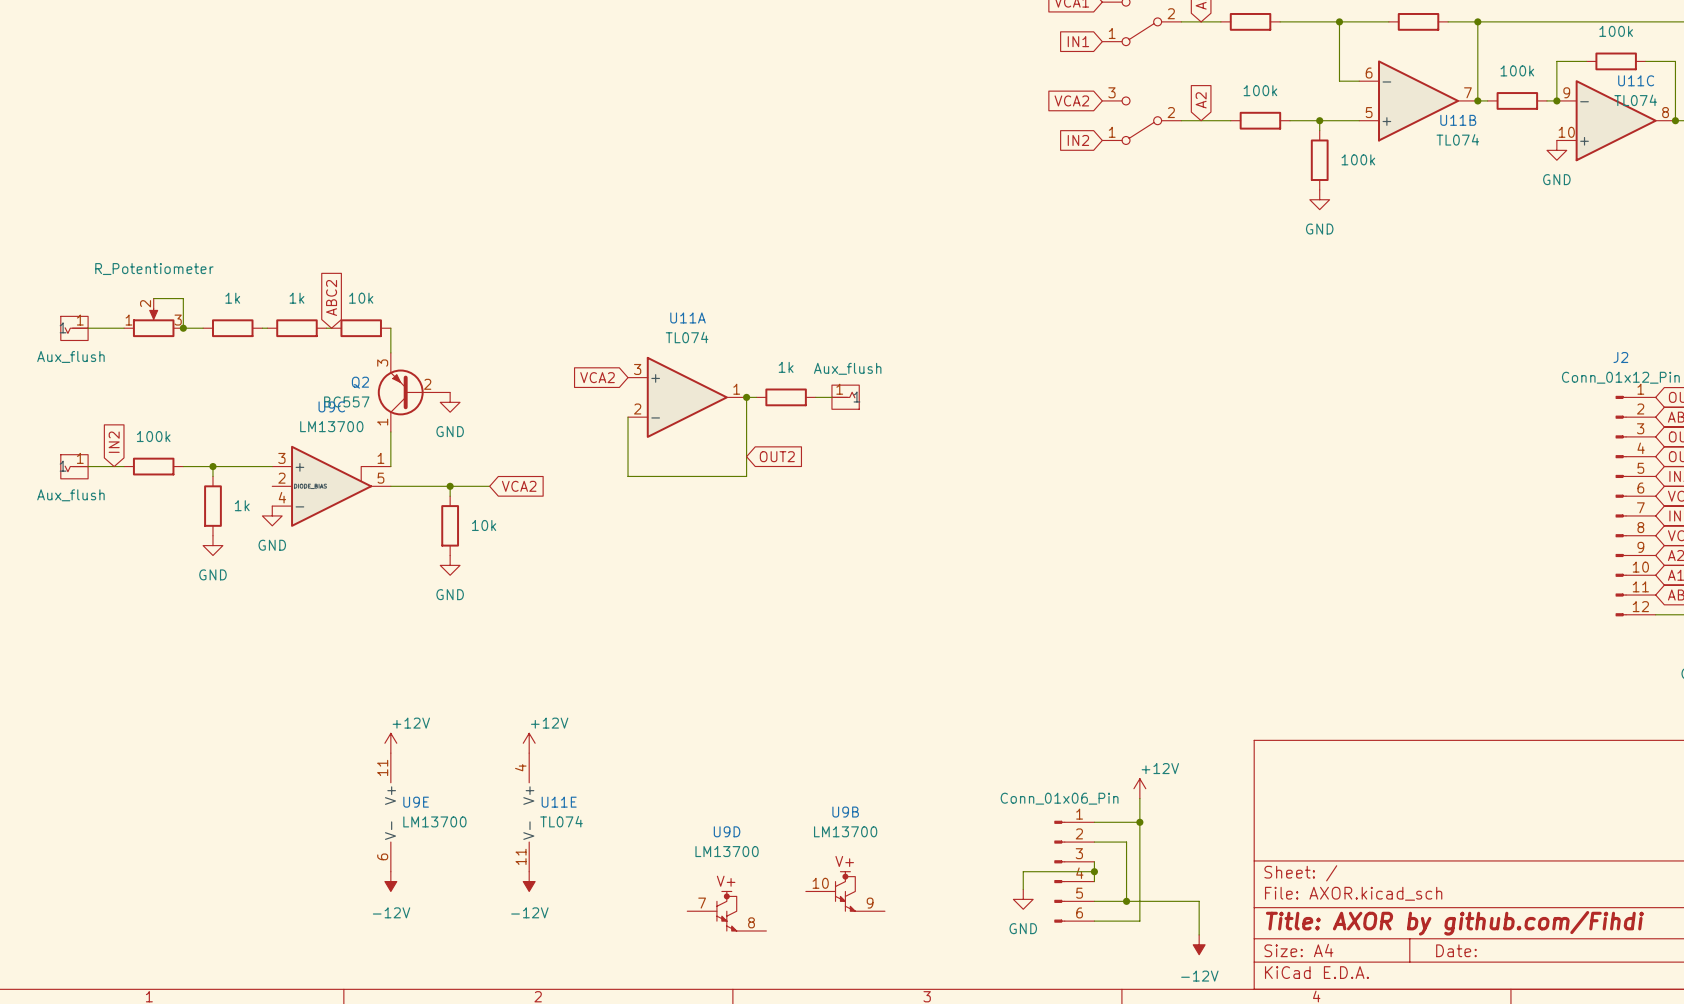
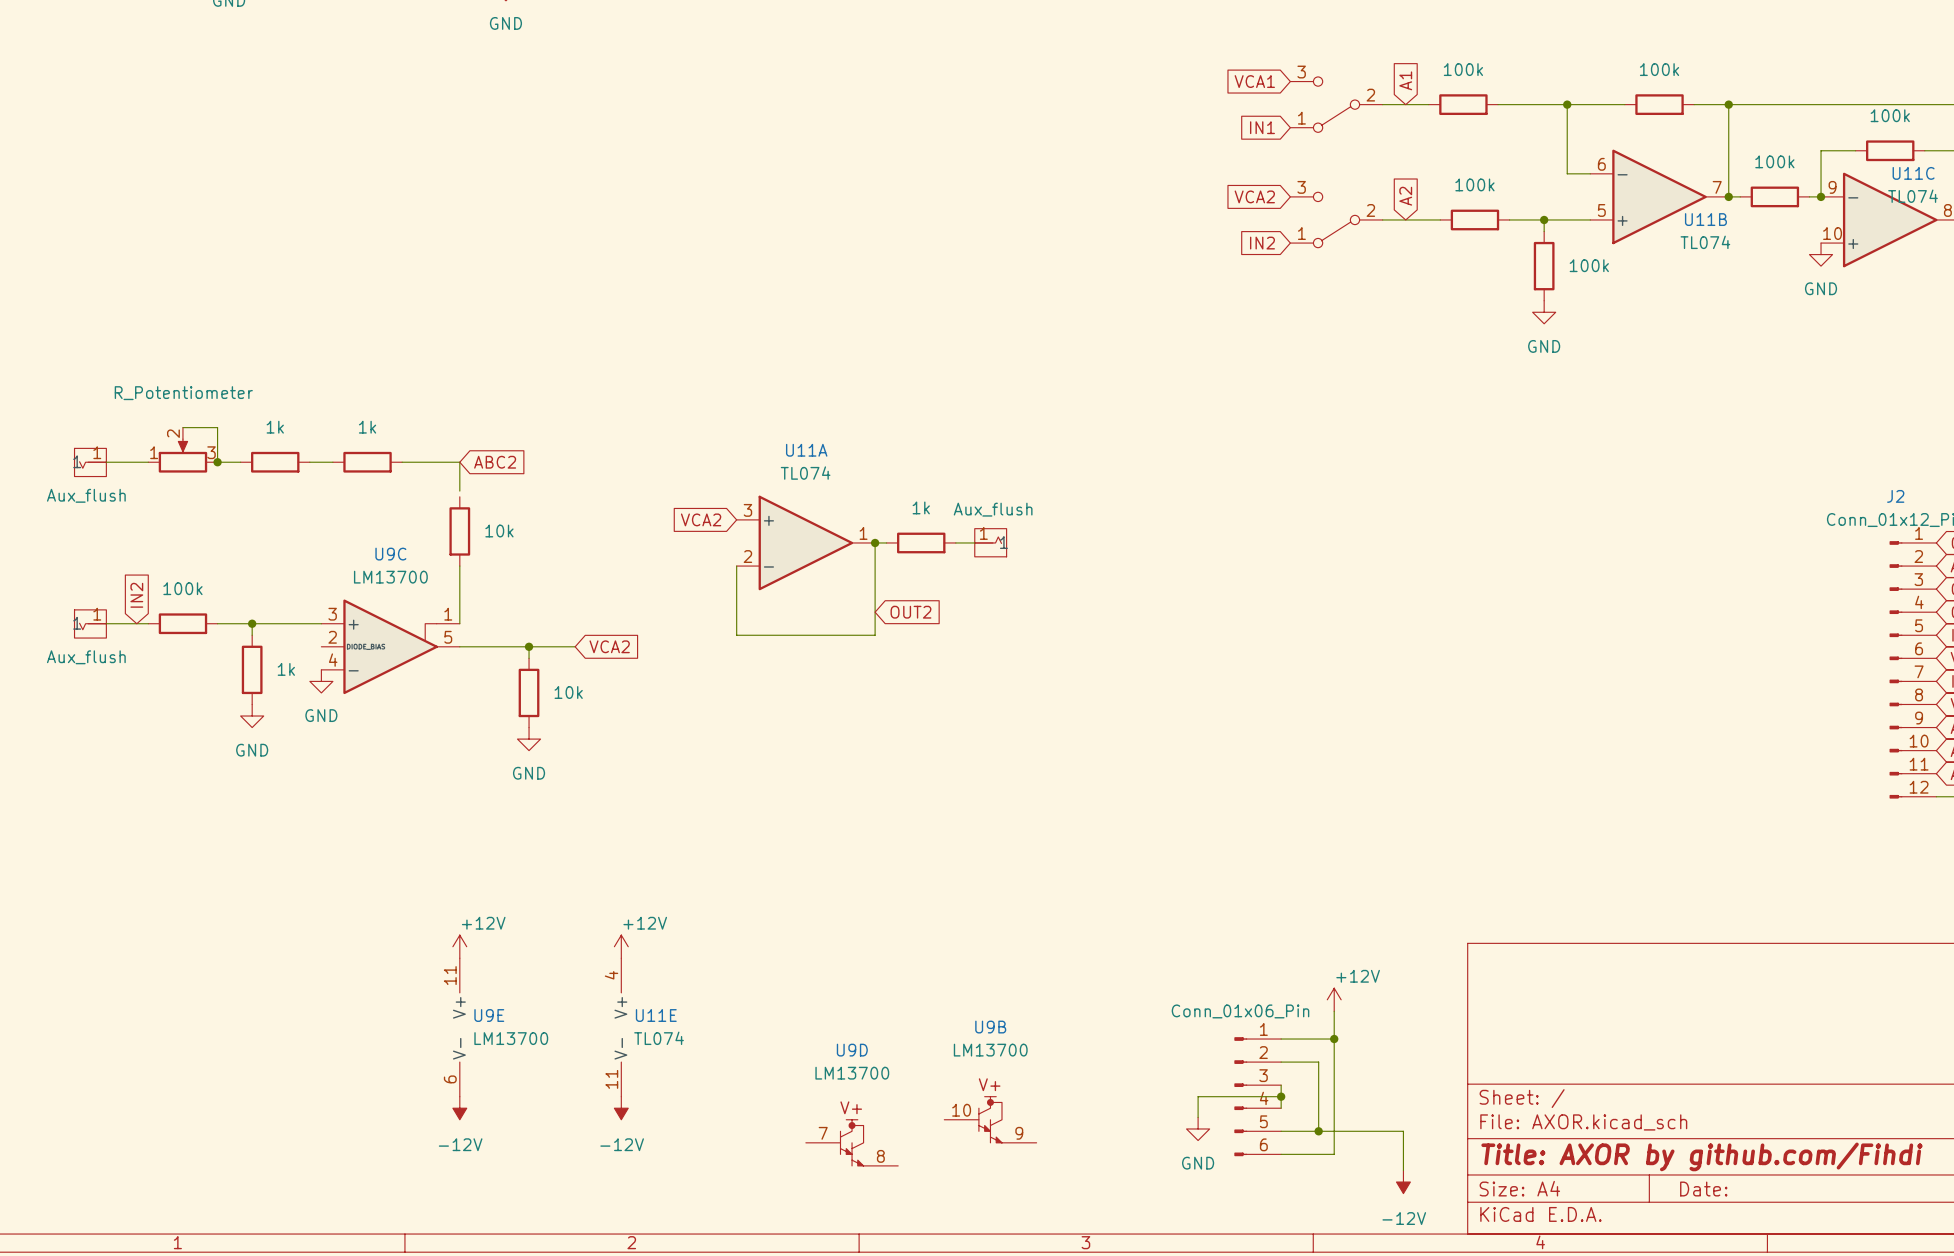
global label rotation: 0° (331, 297) -> 90° clockwise (495, 462)
global label position: ABC2 (331, 297) -> ABC2 (495, 462)
part position: (296, 328) -> (367, 462)
wire: (326, 328) (331, 328) -> none
wire: none -> (402, 462) (459, 462)
part rotation: 0° (361, 328) -> 90° clockwise (459, 531)
part position: (361, 328) -> (459, 531)
Q2: BC557 (413, 392) -> none
power symbol: GND (450, 402) -> none

